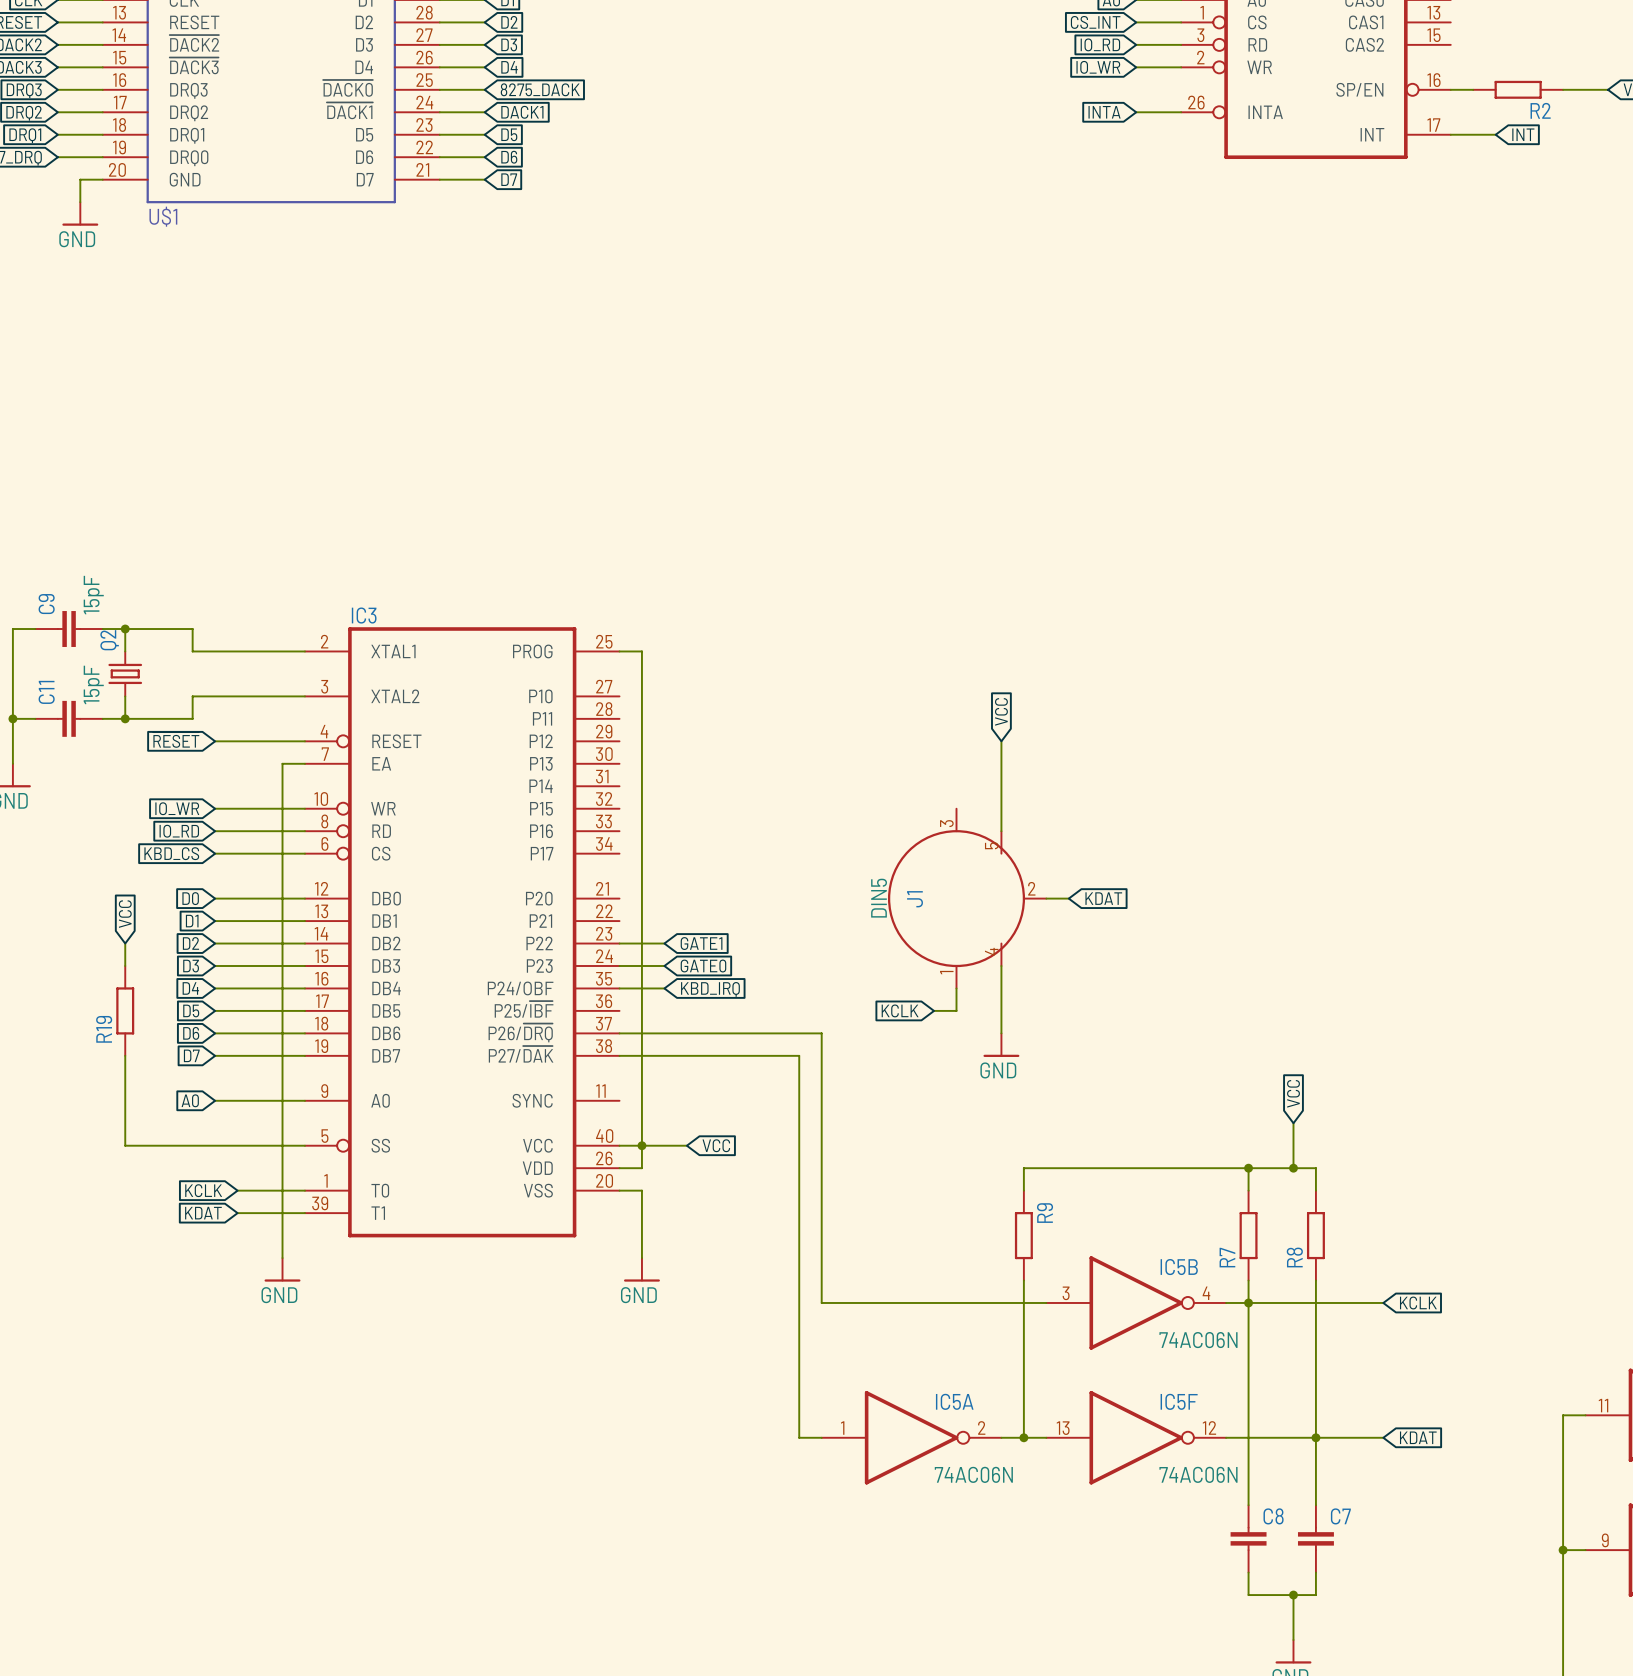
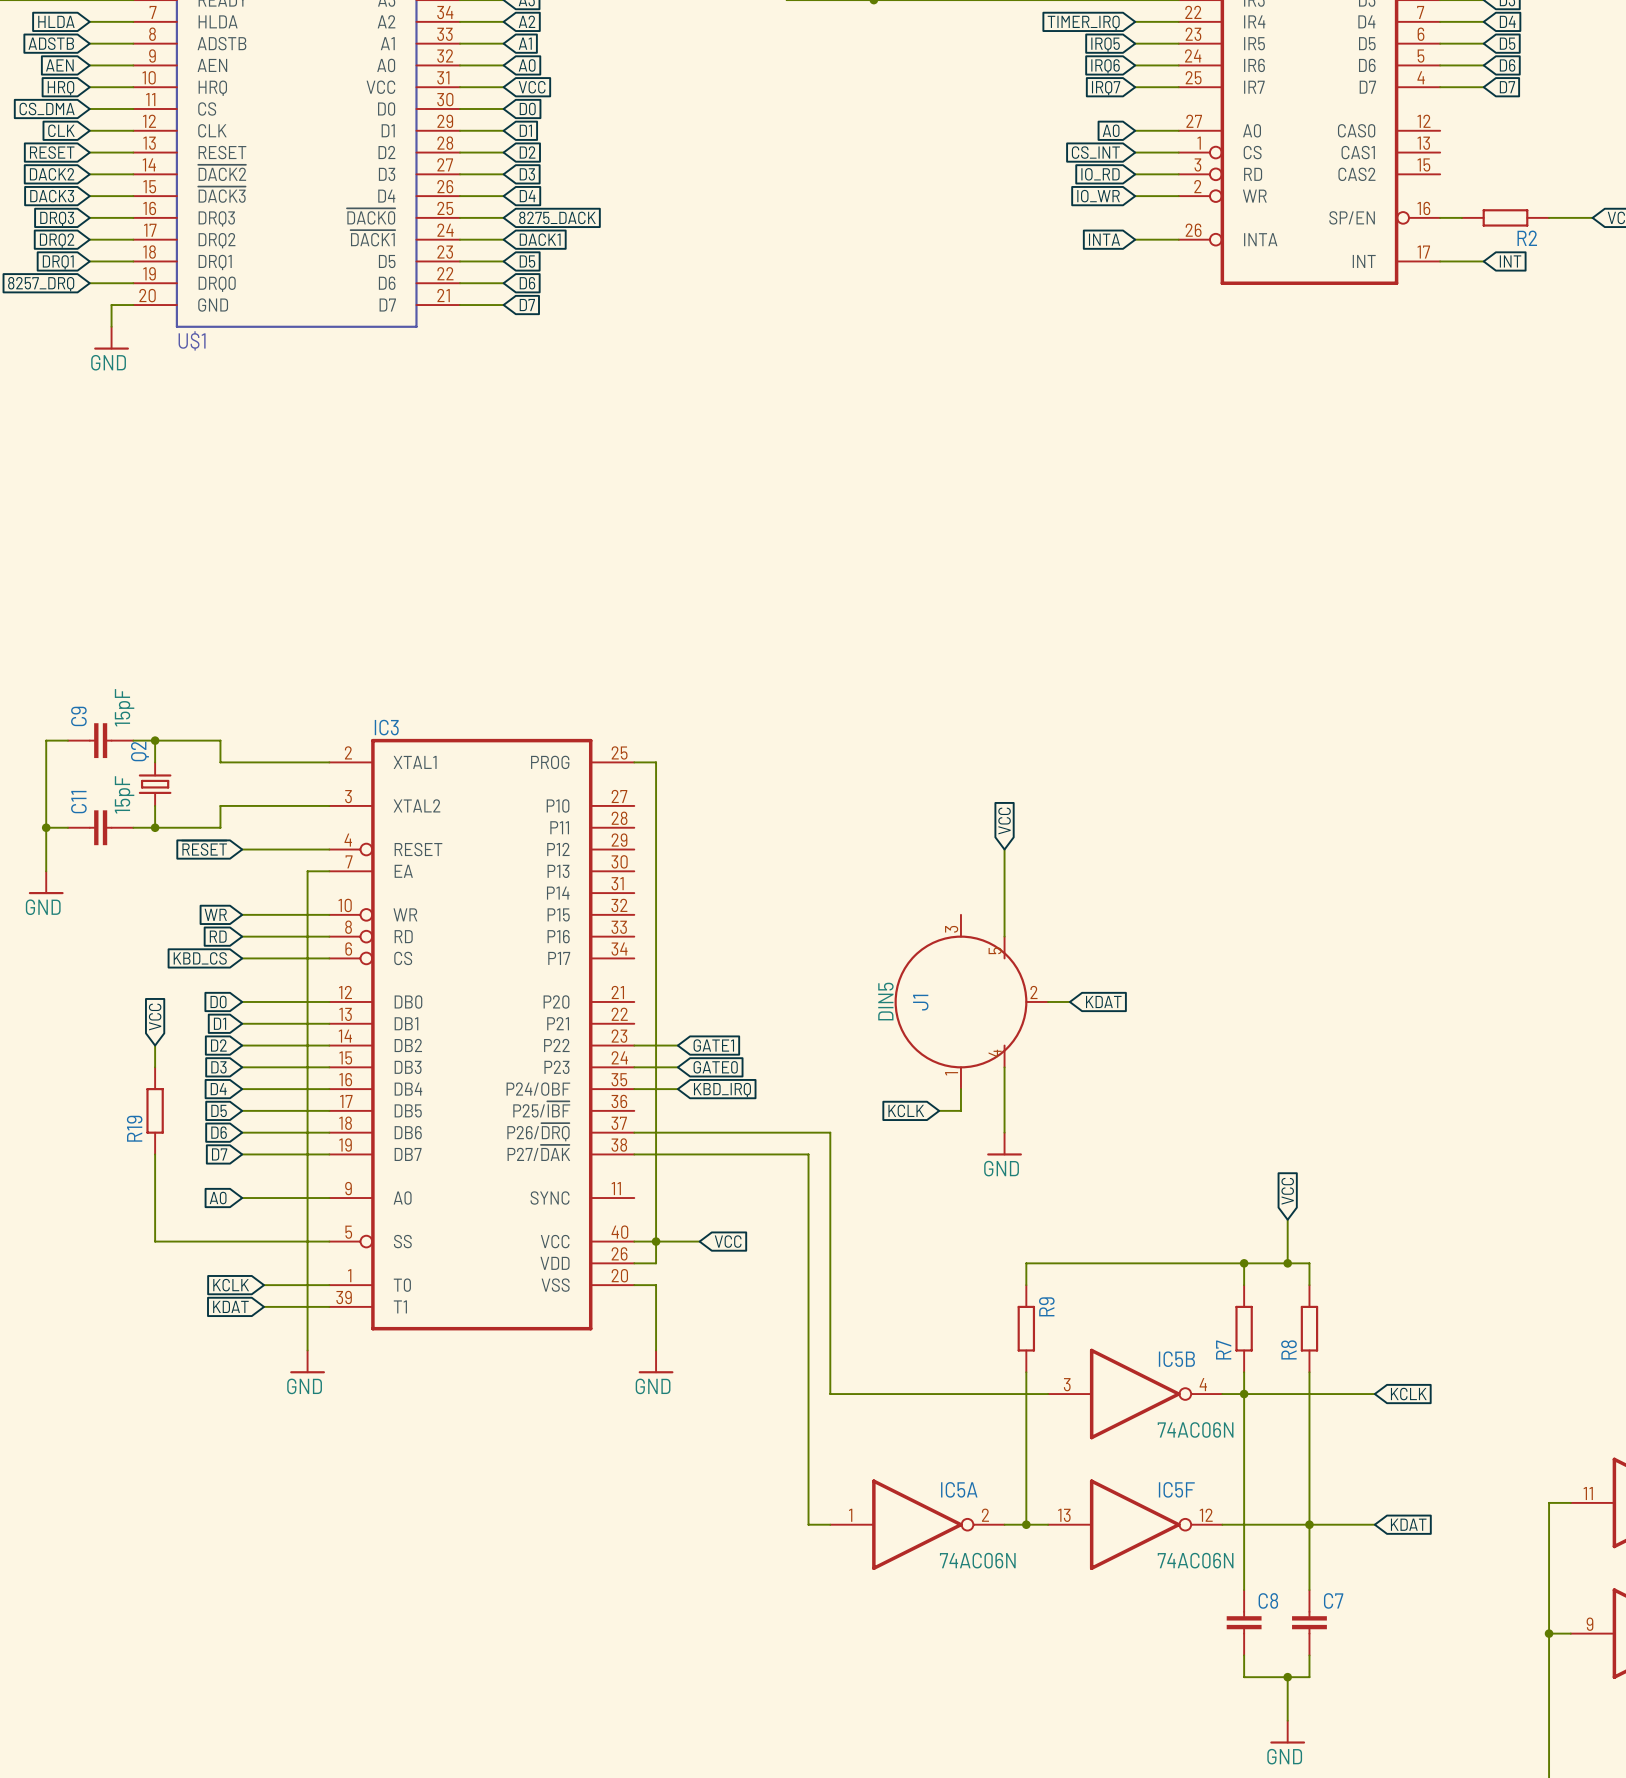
global label: IO_WR (177, 808) -> WR (215, 914)
global label: IO_RD (179, 831) -> RD (218, 936)

